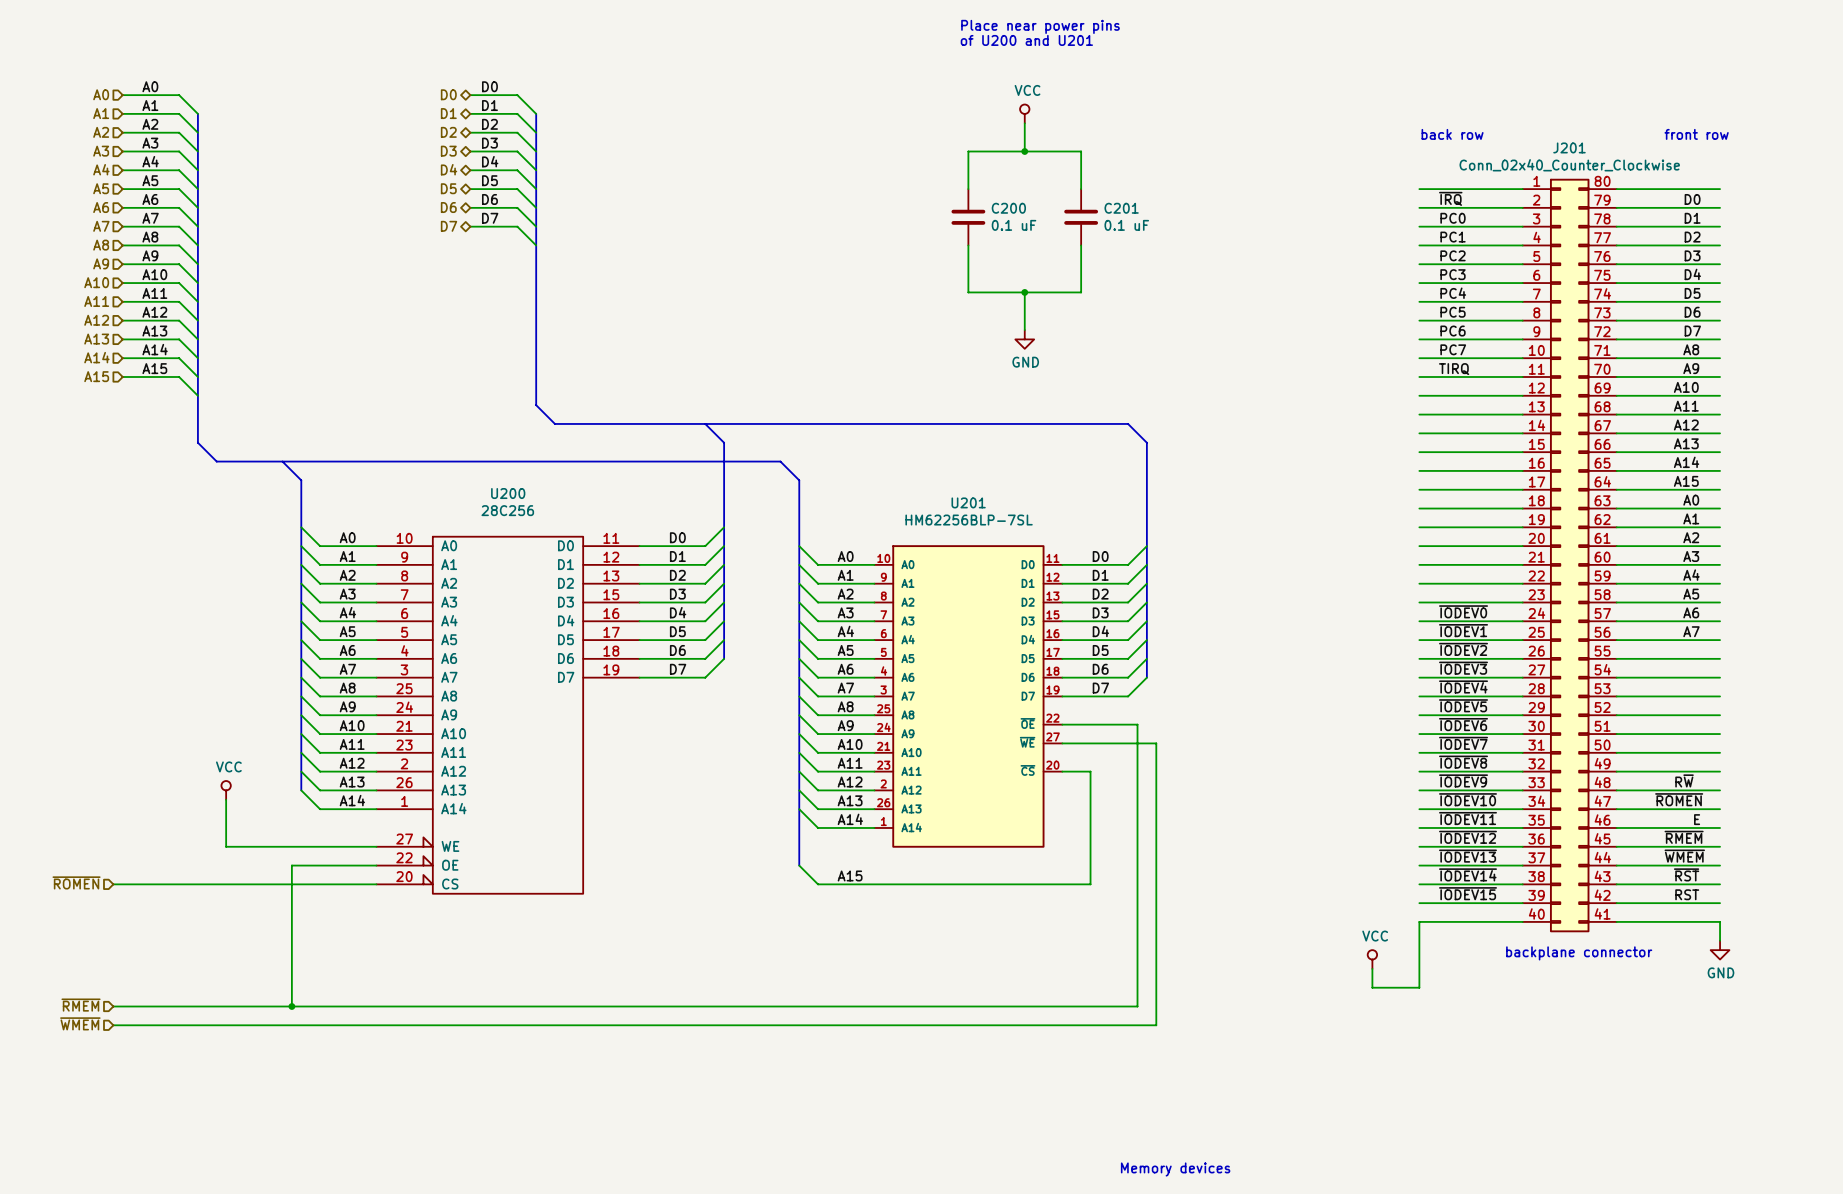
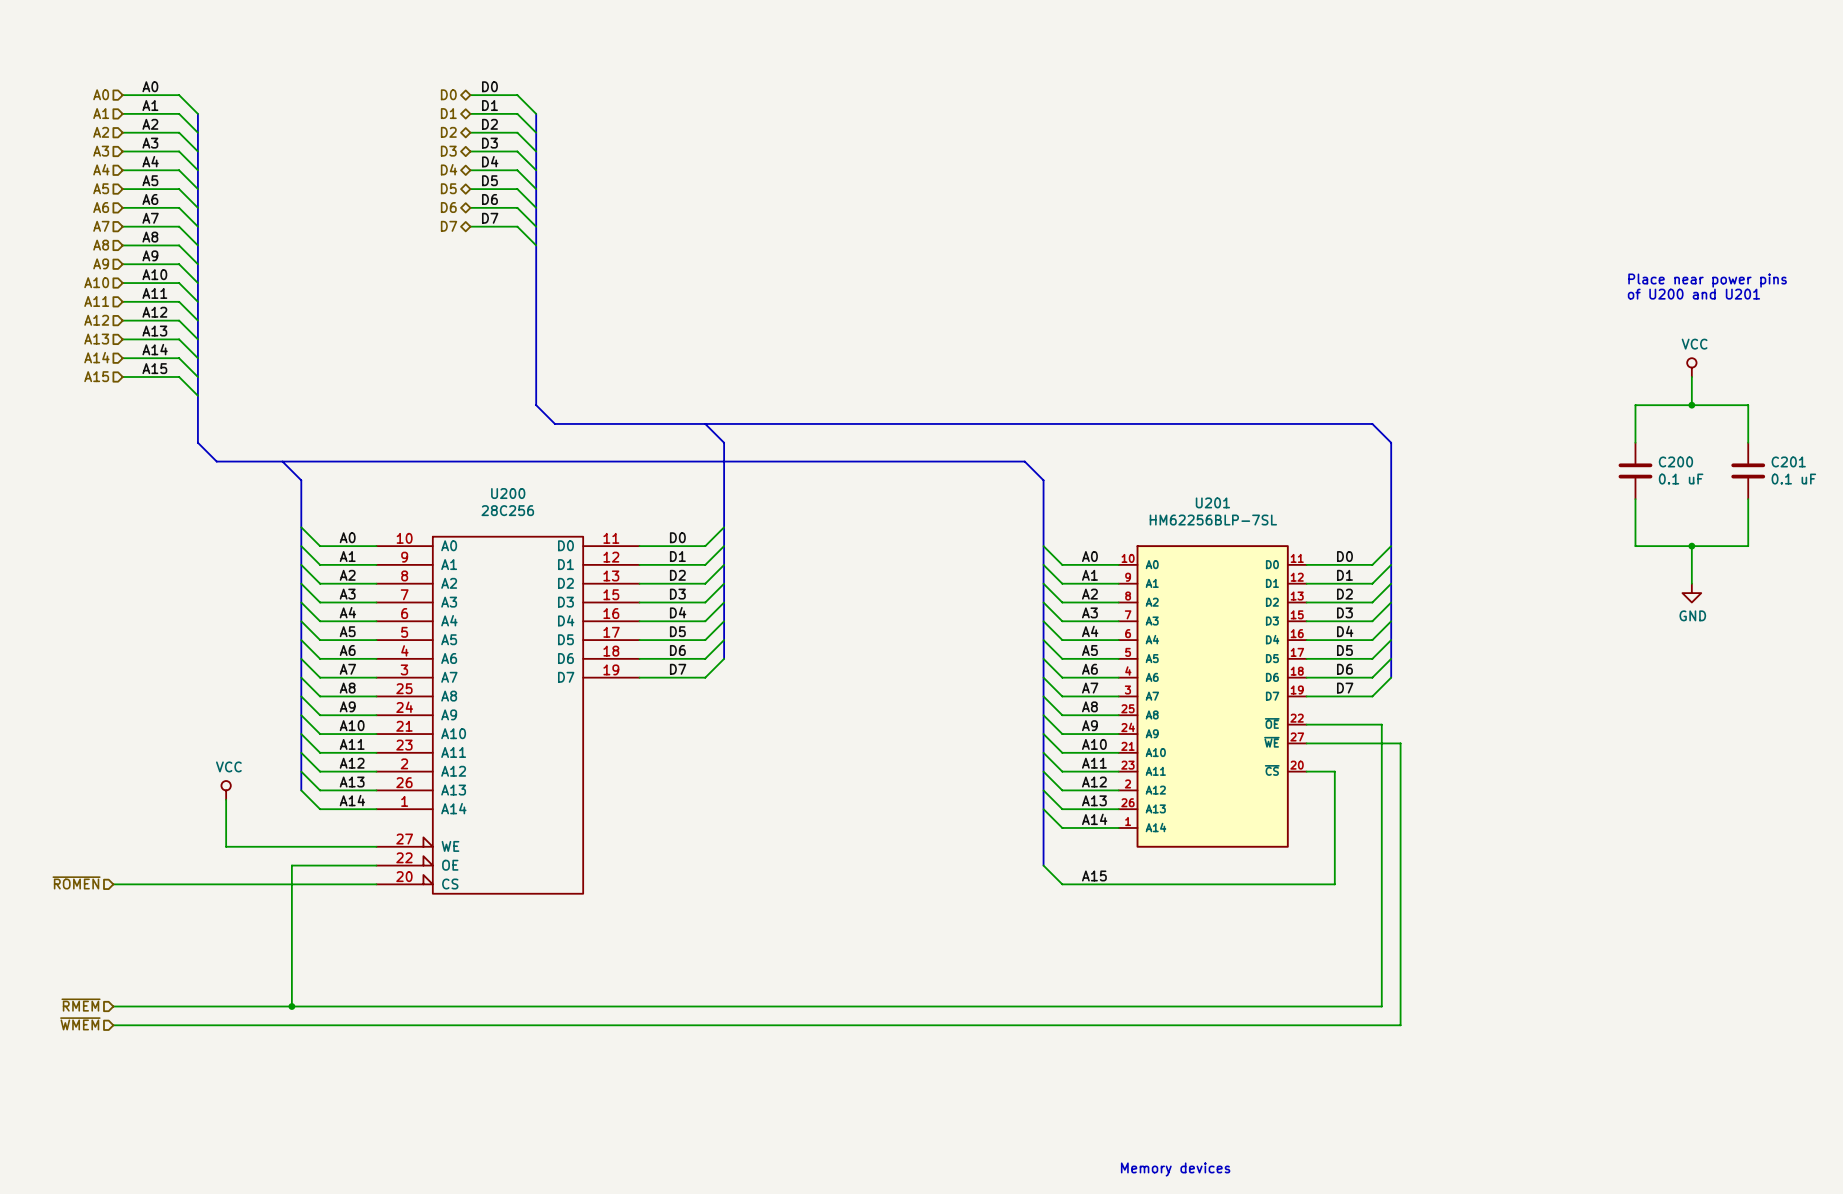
text: Place near power pins (1040, 26) -> none
text: of U200 and U201 (1026, 40) -> none
power symbol: VCC (1024, 113) -> none
wire: (1024, 123) (1024, 151) -> none
text: back row (1452, 134) -> none
text: front row (1696, 134) -> none
junction: (1024, 151) -> none
wire: (968, 189) (968, 151) (1081, 151) (1081, 189) -> none
wire: (1419, 189) (1522, 189) -> none
wire: (1616, 189) (1720, 189) -> none
label: ~{IRQ} (1450, 198) -> none
label: D0 (1692, 199) -> none
wire: (1419, 207) (1522, 207) -> none
wire: (1616, 207) (1720, 207) -> none
C200 position: (968, 217) -> (1635, 470)
C201 position: (1081, 217) -> (1748, 470)
label: PC0 (1453, 218) -> none
label: D1 (1692, 218) -> none
wire: (1419, 226) (1522, 226) -> none
wire: (1616, 226) (1720, 226) -> none
label: PC1 (1453, 237) -> none
label: D2 (1692, 237) -> none
wire: (968, 245) (968, 292) (1081, 292) (1081, 245) -> none
wire: (1419, 245) (1522, 245) -> none
wire: (1616, 245) (1720, 245) -> none
label: PC2 (1453, 255) -> none
label: D3 (1692, 255) -> none
wire: (1419, 264) (1522, 264) -> none
wire: (1616, 264) (1720, 264) -> none
label: PC3 (1453, 274) -> none
label: D4 (1692, 274) -> none
text: none -> Place near power pins (1707, 280)
wire: (1419, 283) (1522, 283) -> none
wire: (1616, 283) (1720, 283) -> none
wire: (1024, 292) (1024, 330) -> none
junction: (1024, 292) -> none
label: PC4 (1453, 293) -> none
label: D5 (1692, 293) -> none
text: none -> of U200 and U201 (1693, 294)
wire: (1419, 301) (1522, 301) -> none
wire: (1616, 301) (1720, 301) -> none
label: PC5 (1453, 312) -> none
label: D6 (1692, 312) -> none
wire: (1419, 320) (1522, 320) -> none
wire: (1616, 320) (1720, 320) -> none
label: PC6 (1453, 331) -> none
label: D7 (1692, 331) -> none
power symbol: GND (1024, 339) -> none
wire: (1419, 339) (1522, 339) -> none
wire: (1616, 339) (1720, 339) -> none
label: PC7 (1453, 349) -> none
label: A8 (1691, 349) -> none
wire: (1419, 358) (1522, 358) -> none
wire: (1616, 358) (1720, 358) -> none
power symbol: none -> VCC (1691, 367)
label: A9 (1691, 368) -> none
label: TIRQ (1454, 369) -> none
wire: (1419, 376) (1522, 376) -> none
wire: (1616, 376) (1720, 376) -> none
wire: none -> (1691, 376) (1691, 405)
label: A10 (1686, 387) -> none
wire: (1419, 395) (1522, 395) -> none
wire: (1616, 395) (1720, 395) -> none
junction: none -> (1691, 405)
label: A11 (1686, 406) -> none
wire: (1419, 414) (1522, 414) -> none
wire: (1616, 414) (1720, 414) -> none
bus: (1128, 423) (1146, 442) (1146, 677) -> (1128, 423) (1372, 423) (1391, 442) (1391, 677)
label: A12 (1686, 424) -> none
wire: (1419, 433) (1522, 433) -> none
wire: (1616, 433) (1720, 433) -> none
wire: none -> (1635, 442) (1635, 405) (1748, 405) (1748, 442)
label: A13 (1686, 443) -> none
wire: (1419, 452) (1522, 452) -> none
wire: (1616, 452) (1720, 452) -> none
bus: (780, 461) (799, 480) (799, 865) -> (780, 461) (1024, 461) (1043, 480) (1043, 865)
label: A14 (1686, 462) -> none
wire: (1419, 470) (1522, 470) -> none
wire: (1616, 470) (1720, 470) -> none
label: A15 (1686, 481) -> none
wire: (1419, 489) (1522, 489) -> none
wire: (1616, 489) (1720, 489) -> none
wire: none -> (1748, 499) (1748, 546) (1720, 546)
label: A0 (1691, 500) -> none
wire: (1419, 508) (1522, 508) -> none
wire: (1616, 508) (1720, 508) -> none
label: A1 (1691, 518) -> none
wire: (1419, 527) (1522, 527) -> none
wire: (1616, 527) (1720, 527) -> none
label: A2 (1691, 537) -> none
wire: (799, 546) (818, 564) (874, 564) -> none
wire: none -> (1043, 546) (1062, 564)
wire: none -> (1391, 546) (1372, 564) (1306, 564)
wire: (1419, 546) (1522, 546) -> none
wire: (1616, 546) (1635, 546) -> (1635, 499) (1635, 546)
wire: none -> (1691, 546) (1691, 583)
junction: none -> (1691, 546)
J201: Conn_02x40_Counter_Clockwise (1569, 555) -> none
label: A0 (845, 556) -> none
label: none -> A0 (1089, 556)
label: D0 (1100, 556) -> none
label: none -> D0 (1344, 556)
label: A3 (1691, 556) -> none
wire: (799, 564) (818, 583) (874, 583) -> none
wire: none -> (1043, 564) (1062, 583)
wire: none -> (1391, 564) (1372, 583) (1306, 583)
wire: (1419, 564) (1522, 564) -> none
wire: (1616, 564) (1720, 564) -> none
label: A1 (845, 575) -> none
label: none -> A1 (1089, 575)
label: D1 (1100, 575) -> none
label: none -> D1 (1344, 575)
label: A4 (1691, 575) -> none
wire: (799, 583) (818, 602) (874, 602) -> none
wire: none -> (1043, 583) (1062, 602)
wire: none -> (1391, 583) (1372, 602) (1306, 602)
wire: (1419, 583) (1522, 583) -> none
wire: (1616, 583) (1720, 583) -> none
power symbol: none -> GND (1691, 593)
label: A2 (845, 594) -> none
label: none -> A2 (1089, 594)
label: D2 (1100, 594) -> none
label: none -> D2 (1344, 594)
label: A5 (1691, 594) -> none
wire: (799, 602) (818, 621) (874, 621) -> none
wire: none -> (1043, 602) (1062, 621)
wire: none -> (1391, 602) (1372, 621) (1306, 621)
wire: (1419, 602) (1522, 602) -> none
wire: (1616, 602) (1720, 602) -> none
label: ~{IODEV0} (1463, 611) -> none
label: A3 (845, 612) -> none
label: none -> A3 (1089, 612)
label: D3 (1100, 612) -> none
label: none -> D3 (1344, 612)
label: A6 (1691, 612) -> none
wire: (799, 621) (818, 640) (874, 640) -> none
wire: none -> (1043, 621) (1062, 640)
wire: none -> (1391, 621) (1372, 640) (1306, 640)
wire: (1419, 621) (1522, 621) -> none
wire: (1616, 621) (1720, 621) -> none
label: ~{IODEV1} (1463, 630) -> none
label: A4 (845, 631) -> none
label: none -> A4 (1090, 631)
label: D4 (1100, 631) -> none
label: none -> D4 (1345, 631)
label: A7 (1691, 631) -> none
wire: (799, 640) (818, 658) (874, 658) -> none
wire: none -> (1043, 640) (1062, 658)
wire: none -> (1391, 640) (1372, 658) (1306, 658)
wire: (1419, 640) (1522, 640) -> none
wire: (1616, 640) (1720, 640) -> none
label: ~{IODEV2} (1463, 649) -> none
label: A5 (845, 650) -> none
label: none -> A5 (1089, 650)
label: D5 (1100, 650) -> none
label: none -> D5 (1344, 650)
wire: (799, 658) (818, 677) (874, 677) -> none
wire: none -> (1043, 658) (1062, 677)
wire: none -> (1391, 658) (1372, 677) (1306, 677)
wire: (1419, 658) (1522, 658) -> none
wire: (1616, 658) (1720, 658) -> none
label: ~{IODEV3} (1463, 668) -> none
label: A6 (845, 669) -> none
label: none -> A6 (1089, 669)
label: D6 (1100, 669) -> none
label: none -> D6 (1344, 669)
wire: (799, 677) (818, 696) (874, 696) -> none
wire: none -> (1043, 677) (1062, 696)
wire: none -> (1391, 677) (1372, 696) (1306, 696)
wire: (1419, 677) (1522, 677) -> none
wire: (1616, 677) (1720, 677) -> none
label: ~{IODEV4} (1463, 686) -> none
label: A7 (845, 688) -> none
label: none -> A7 (1090, 688)
label: D7 (1100, 688) -> none
label: none -> D7 (1345, 688)
wire: (799, 696) (818, 715) (874, 715) -> none
U201 position: (968, 696) -> (1212, 696)
wire: none -> (1043, 696) (1062, 715) (1118, 715)
wire: (1419, 696) (1522, 696) -> none
wire: (1616, 696) (1720, 696) -> none
label: ~{IODEV5} (1463, 705) -> none
label: A8 (845, 706) -> none
label: none -> A8 (1089, 706)
wire: (799, 715) (818, 734) (874, 734) -> none
wire: none -> (1043, 715) (1062, 734) (1118, 734)
wire: (1419, 715) (1522, 715) -> none
wire: (1616, 715) (1720, 715) -> none
wire: (1062, 724) (1137, 724) (1137, 1006) -> (1306, 724) (1381, 724) (1381, 1006) (1137, 1006)
label: ~{IODEV6} (1463, 724) -> none
label: A9 (845, 725) -> none
label: none -> A9 (1089, 725)
wire: (799, 734) (818, 752) (874, 752) -> none
wire: none -> (1043, 734) (1062, 752) (1118, 752)
wire: (1419, 734) (1522, 734) -> none
wire: (1616, 734) (1720, 734) -> none
wire: (1062, 743) (1156, 743) (1156, 1025) -> (1306, 743) (1400, 743) (1400, 1025) (1156, 1025)
label: ~{IODEV7} (1463, 743) -> none
label: A10 (850, 744) -> none
label: none -> A10 (1094, 744)
wire: (799, 752) (818, 771) (874, 771) -> none
wire: none -> (1043, 752) (1062, 771)
wire: (1419, 752) (1522, 752) -> none
wire: (1616, 752) (1720, 752) -> none
label: ~{IODEV8} (1463, 762) -> none
label: A11 (850, 763) -> none
label: none -> A11 (1094, 763)
wire: (799, 771) (818, 790) (874, 790) -> none
wire: none -> (1043, 771) (1062, 790) (1118, 790)
wire: (1090, 771) (1090, 884) -> (1090, 771) (1118, 771)
wire: none -> (1306, 771) (1334, 771) (1334, 884) (1090, 884)
wire: (1419, 771) (1522, 771) -> none
wire: (1616, 771) (1720, 771) -> none
label: ~{IODEV9} (1463, 780) -> none
label: R~{W} (1684, 780) -> none
label: A12 (850, 782) -> none
label: none -> A12 (1094, 782)
wire: (799, 790) (818, 809) (874, 809) -> none
wire: none -> (1043, 790) (1062, 809) (1118, 809)
wire: (1419, 790) (1522, 790) -> none
wire: (1616, 790) (1720, 790) -> none
label: ~{IODEV10} (1467, 799) -> none
label: ~{ROMEN} (1679, 799) -> none
label: A13 (850, 800) -> none
label: none -> A13 (1094, 800)
wire: (799, 809) (818, 827) (874, 827) -> none
wire: none -> (1043, 809) (1062, 827) (1118, 827)
wire: (1419, 809) (1522, 809) -> none
wire: (1616, 809) (1720, 809) -> none
label: ~{IODEV11} (1467, 818) -> none
label: A14 (850, 819) -> none
label: none -> A14 (1094, 819)
label: E (1697, 819) -> none
wire: (1419, 827) (1522, 827) -> none
wire: (1616, 827) (1720, 827) -> none
label: ~{IODEV12} (1467, 837) -> none
label: ~{RMEM} (1684, 837) -> none
wire: (1419, 846) (1522, 846) -> none
wire: (1616, 846) (1720, 846) -> none
label: ~{IODEV13} (1467, 856) -> none
label: ~{WMEM} (1684, 856) -> none
wire: (799, 865) (818, 884) (1062, 884) -> (1043, 865) (1062, 884)
wire: (1419, 865) (1522, 865) -> none
wire: (1616, 865) (1720, 865) -> none
label: ~{IODEV14} (1467, 874) -> none
label: ~{RST} (1686, 874) -> none
label: A15 (850, 875) -> none
label: none -> A15 (1094, 875)
wire: (1419, 884) (1522, 884) -> none
wire: (1616, 884) (1720, 884) -> none
label: ~{IODEV15} (1467, 893) -> none
label: RST (1687, 894) -> none
wire: (1419, 903) (1522, 903) -> none
wire: (1616, 903) (1720, 903) -> none
wire: (1522, 921) (1419, 921) (1419, 987) (1372, 987) (1372, 968) -> none
wire: (1616, 921) (1720, 921) (1720, 940) -> none
power symbol: GND (1720, 950) -> none
text: backplane connector (1579, 953) -> none
power symbol: VCC (1372, 959) -> none

